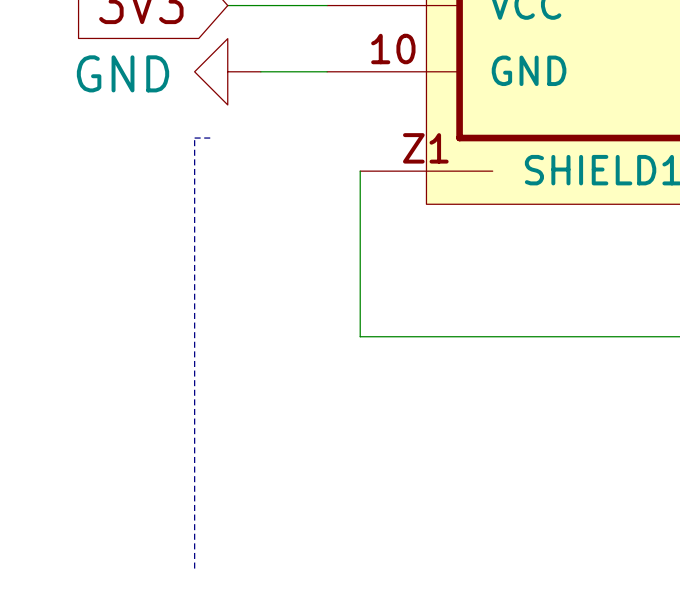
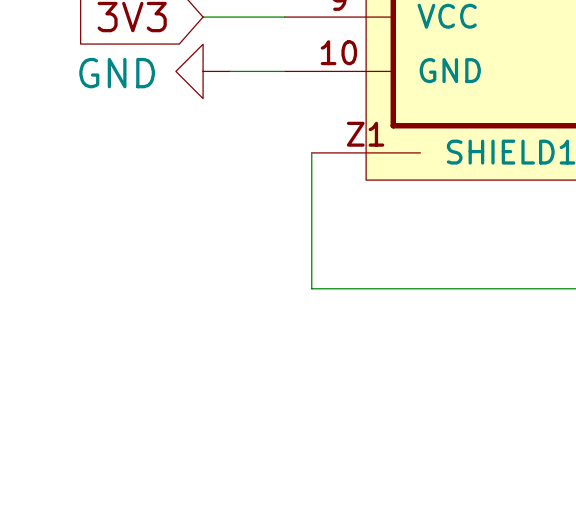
line: (211, 138) (194, 138) (194, 568) -> none

